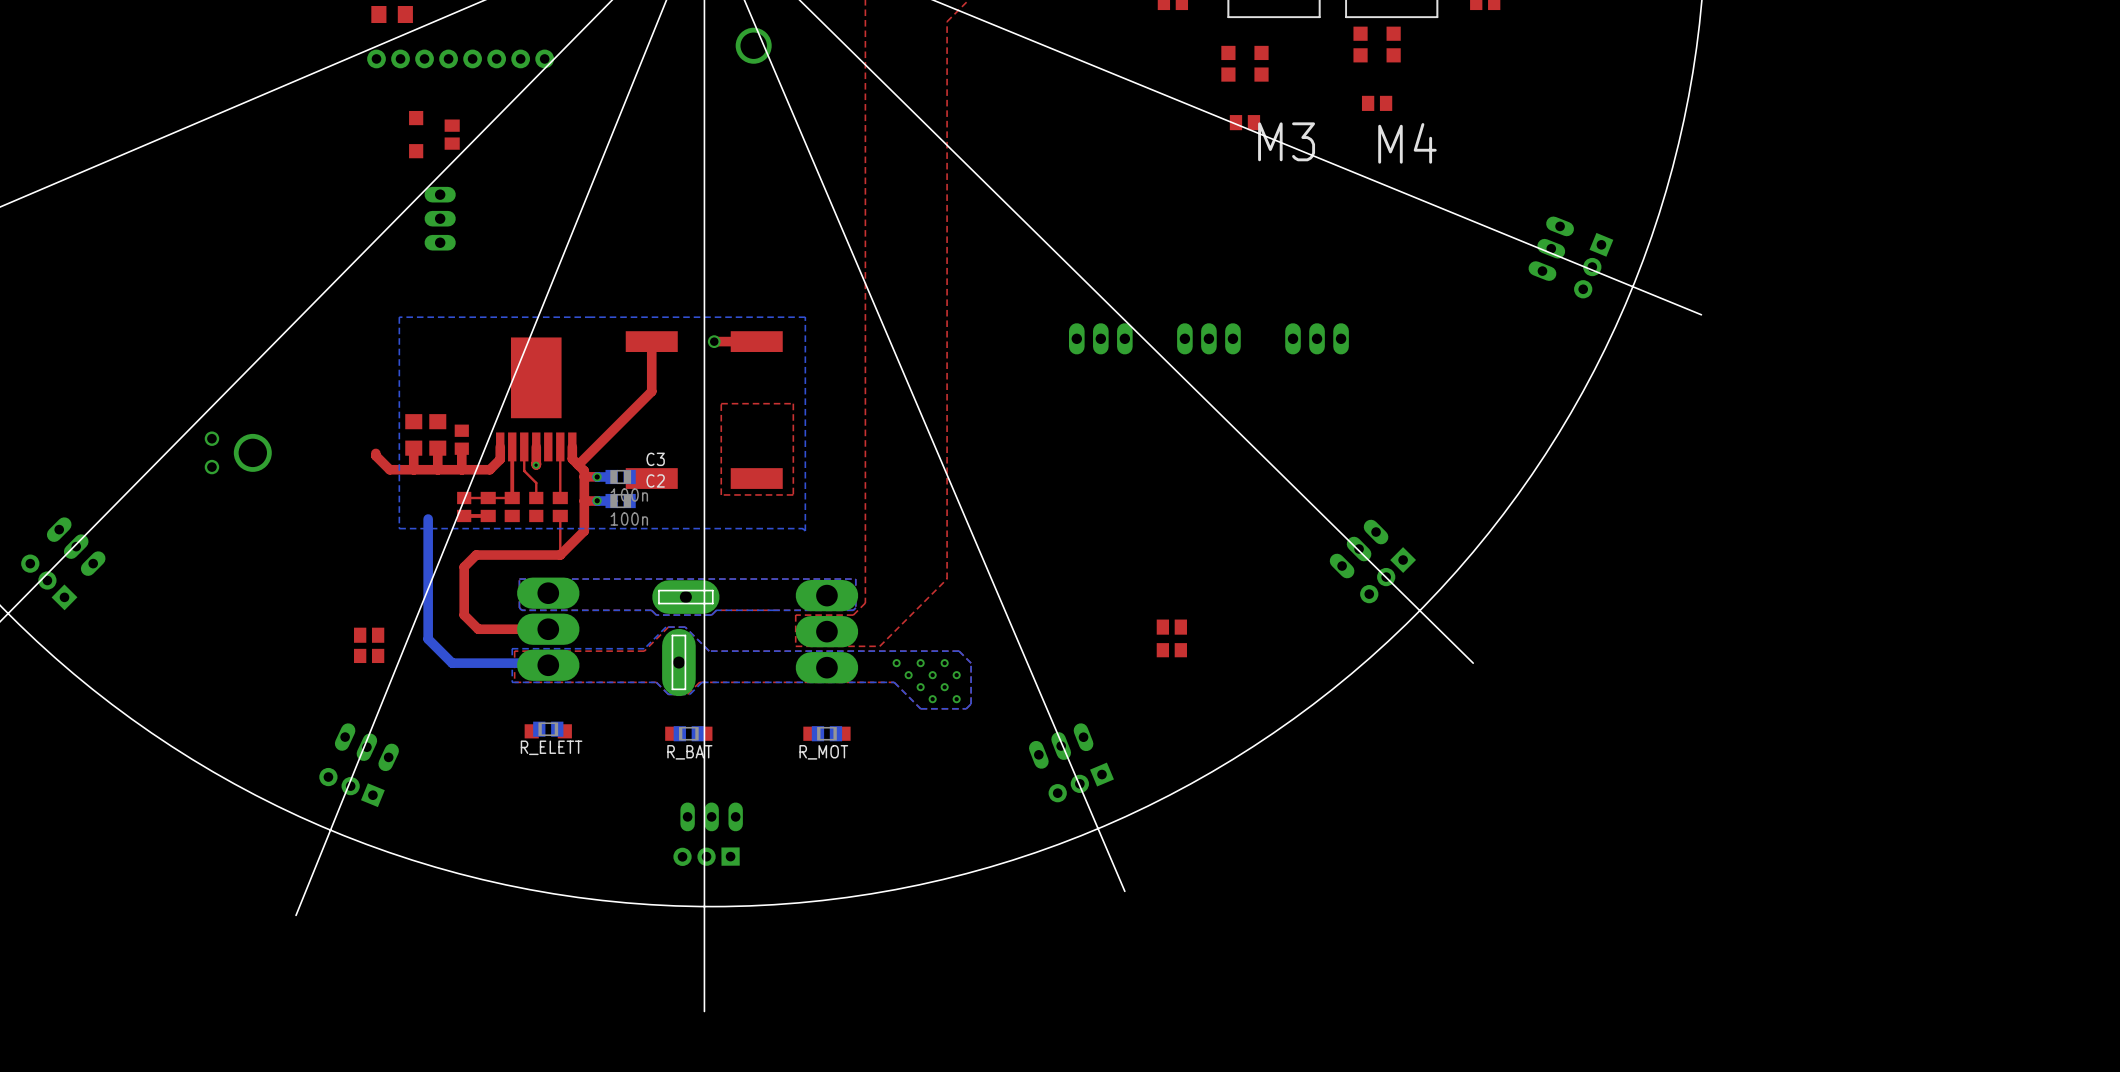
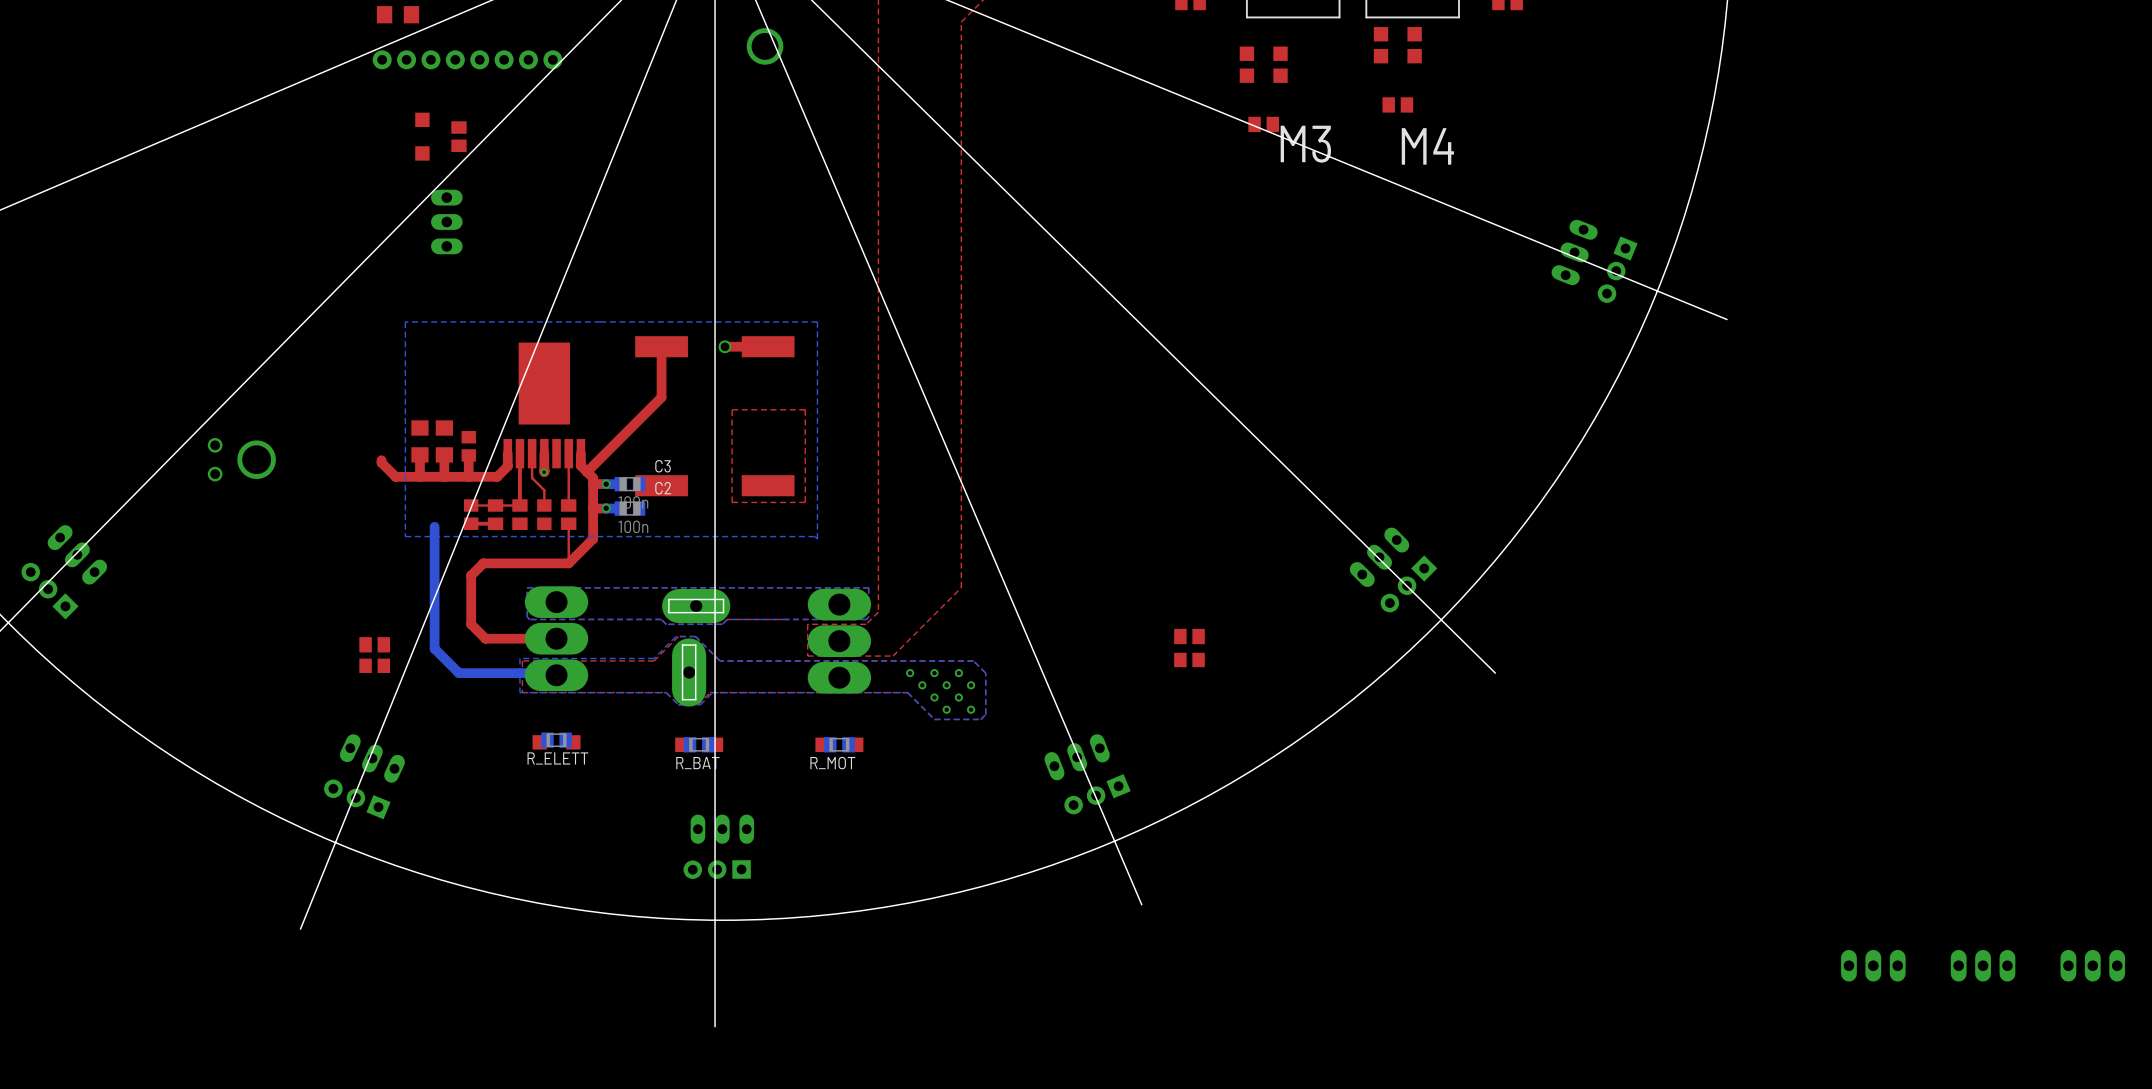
part: (1100, 338) -> none
part: (1208, 338) -> none
part: (1317, 338) -> none
part: none -> (1873, 965)
part: none -> (1983, 965)
part: none -> (2092, 965)

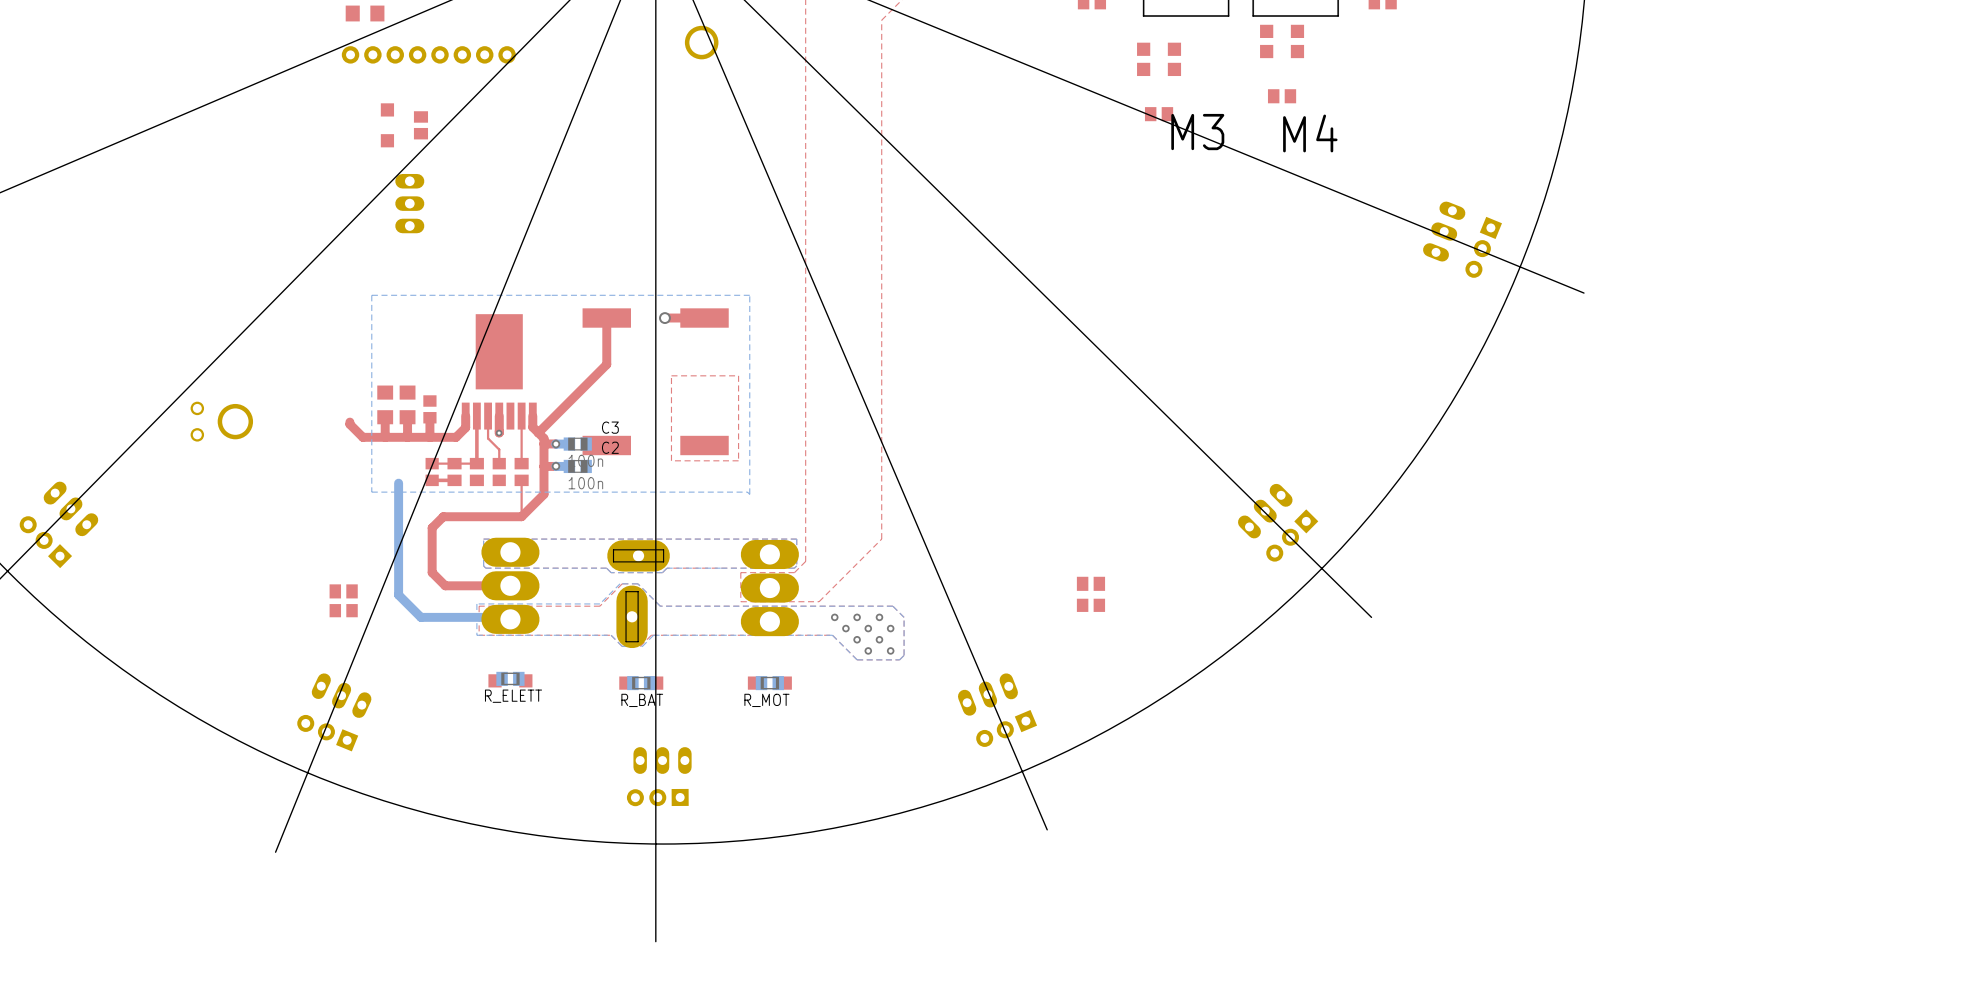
part: (1873, 965) -> none
part: (1983, 965) -> none
part: (2092, 965) -> none

